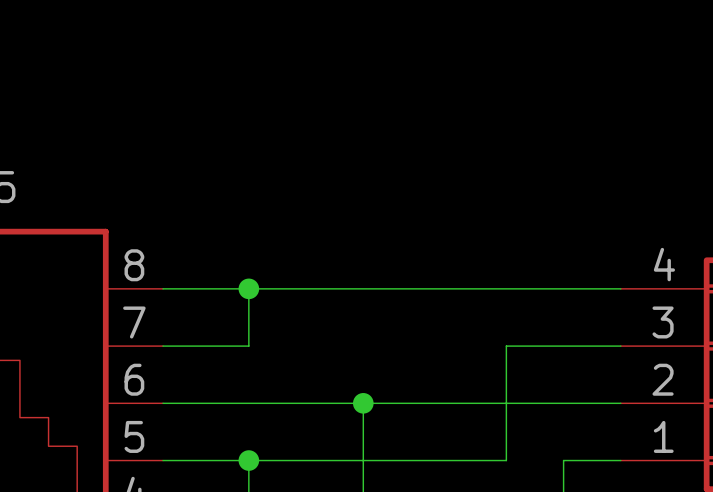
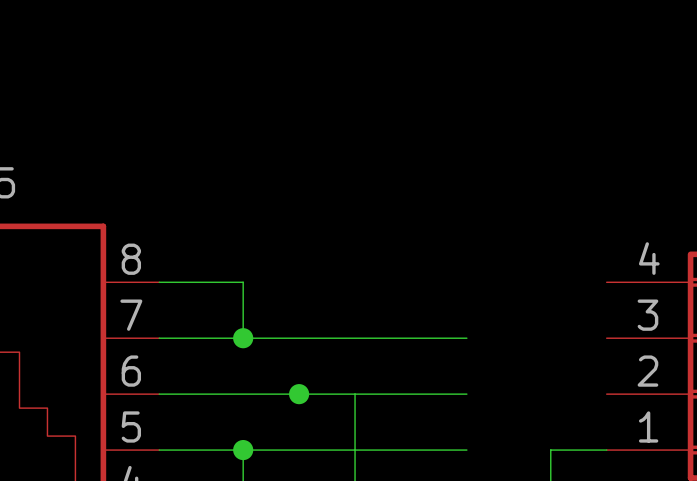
wire: (248, 288) (620, 288) -> none
junction position: (248, 288) -> (243, 338)
wire: none -> (243, 338) (466, 338)
wire: (620, 346) (506, 346) (506, 460) (477, 460) -> none
junction position: (363, 403) -> (299, 394)
wire: (477, 403) (620, 403) -> none

